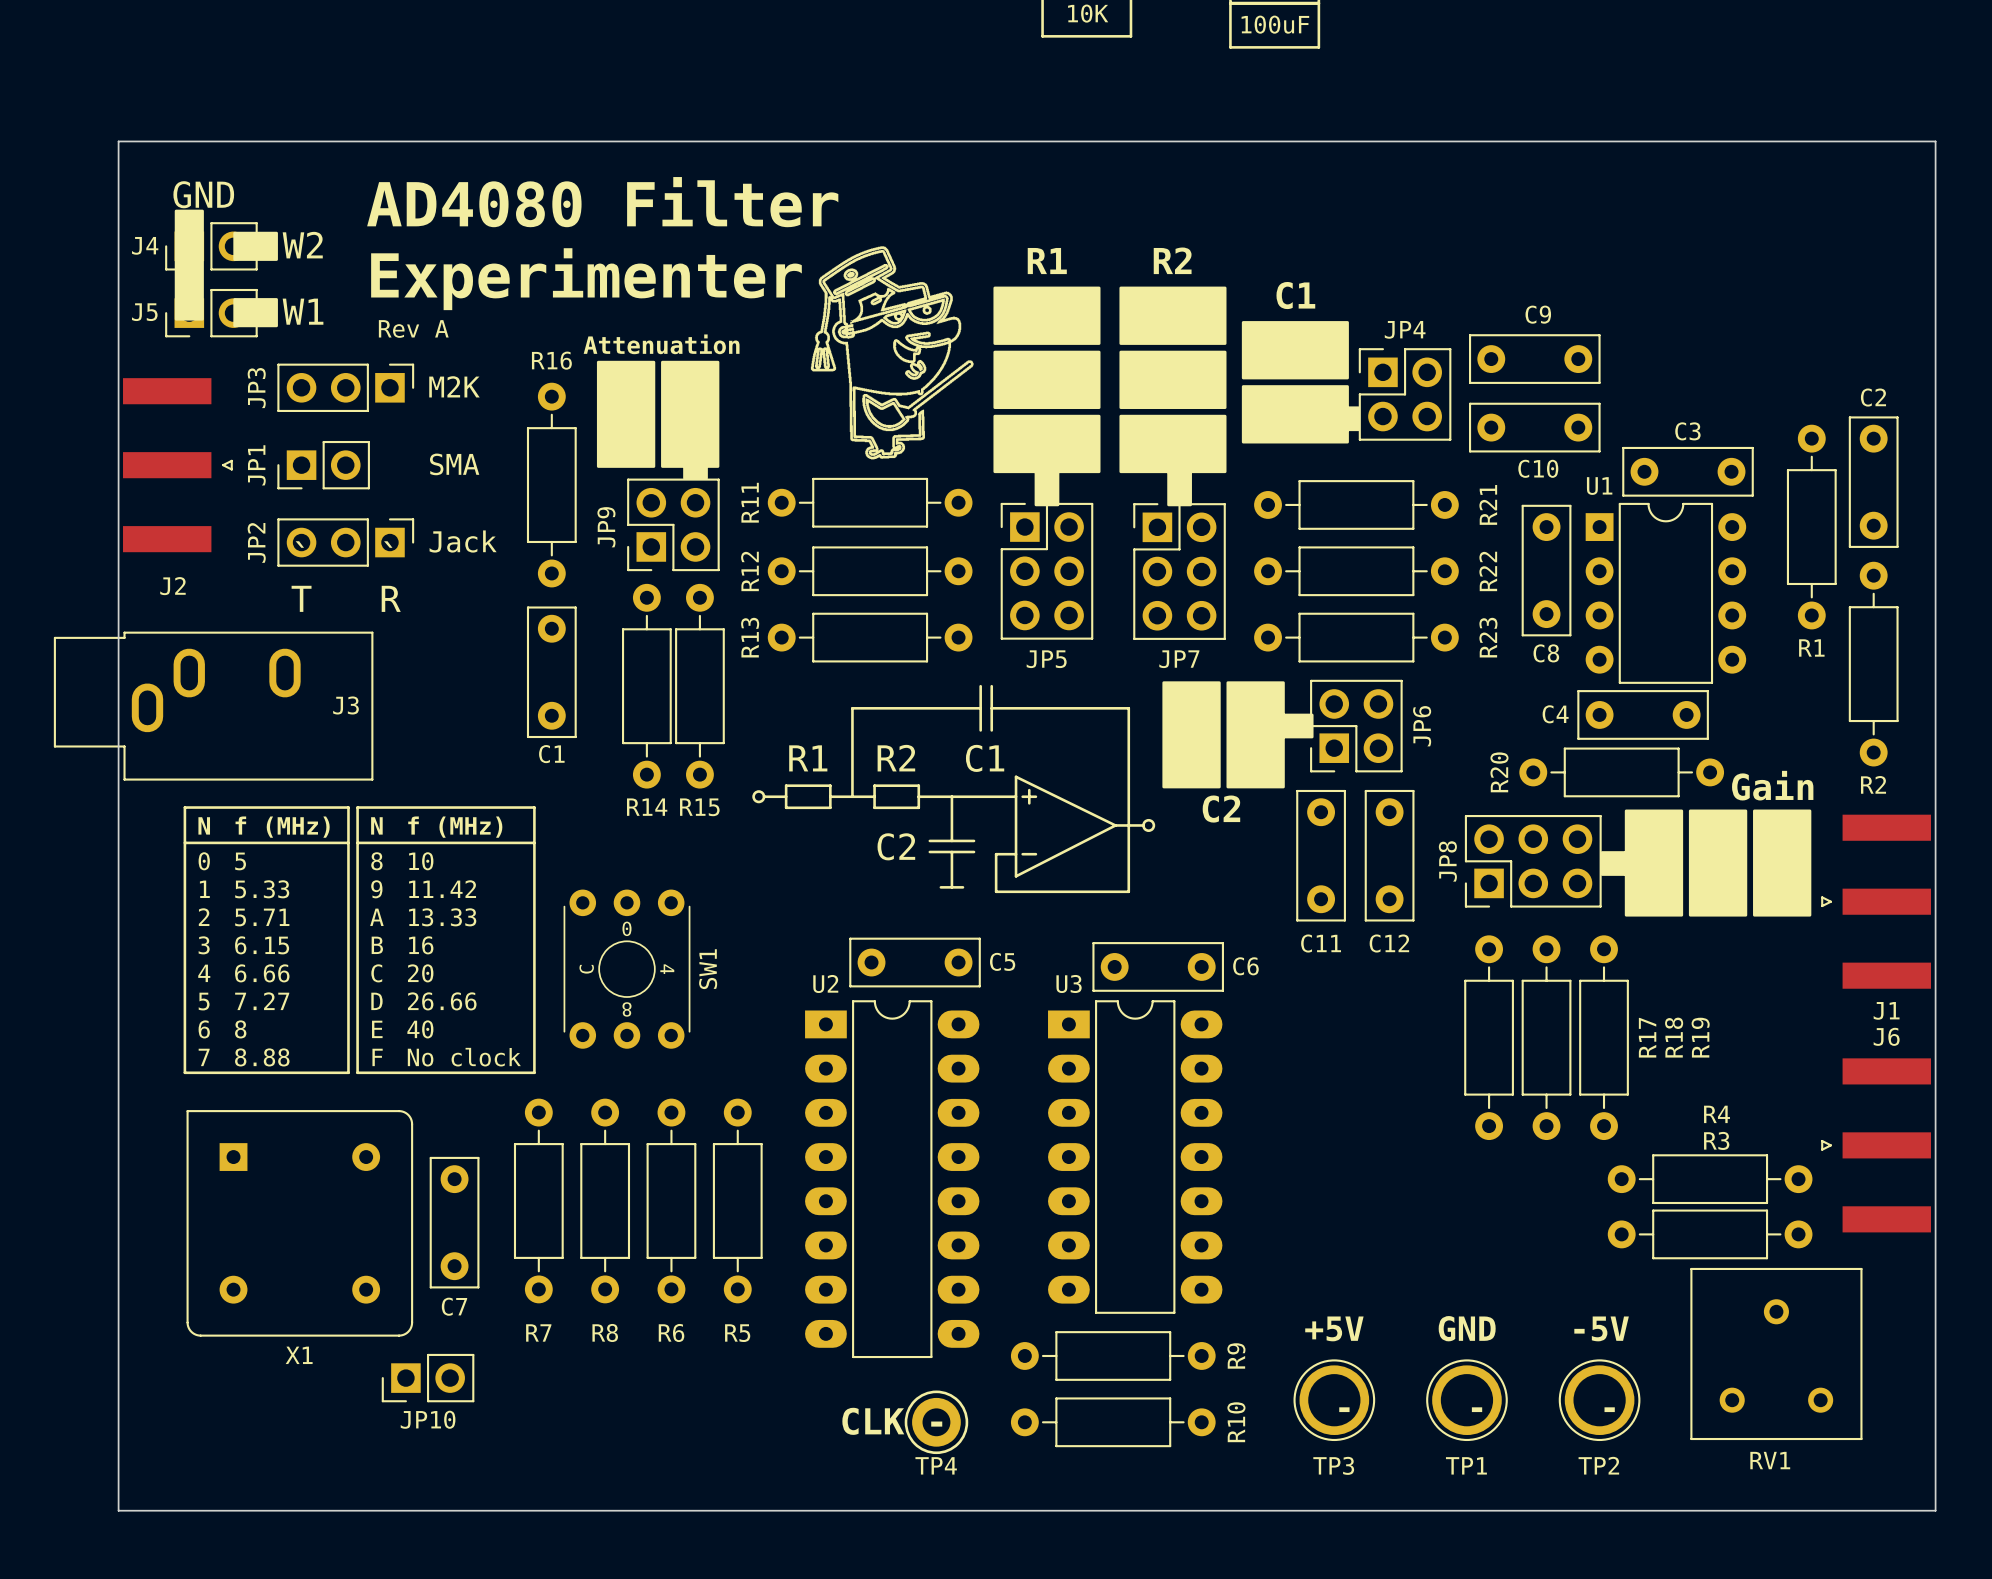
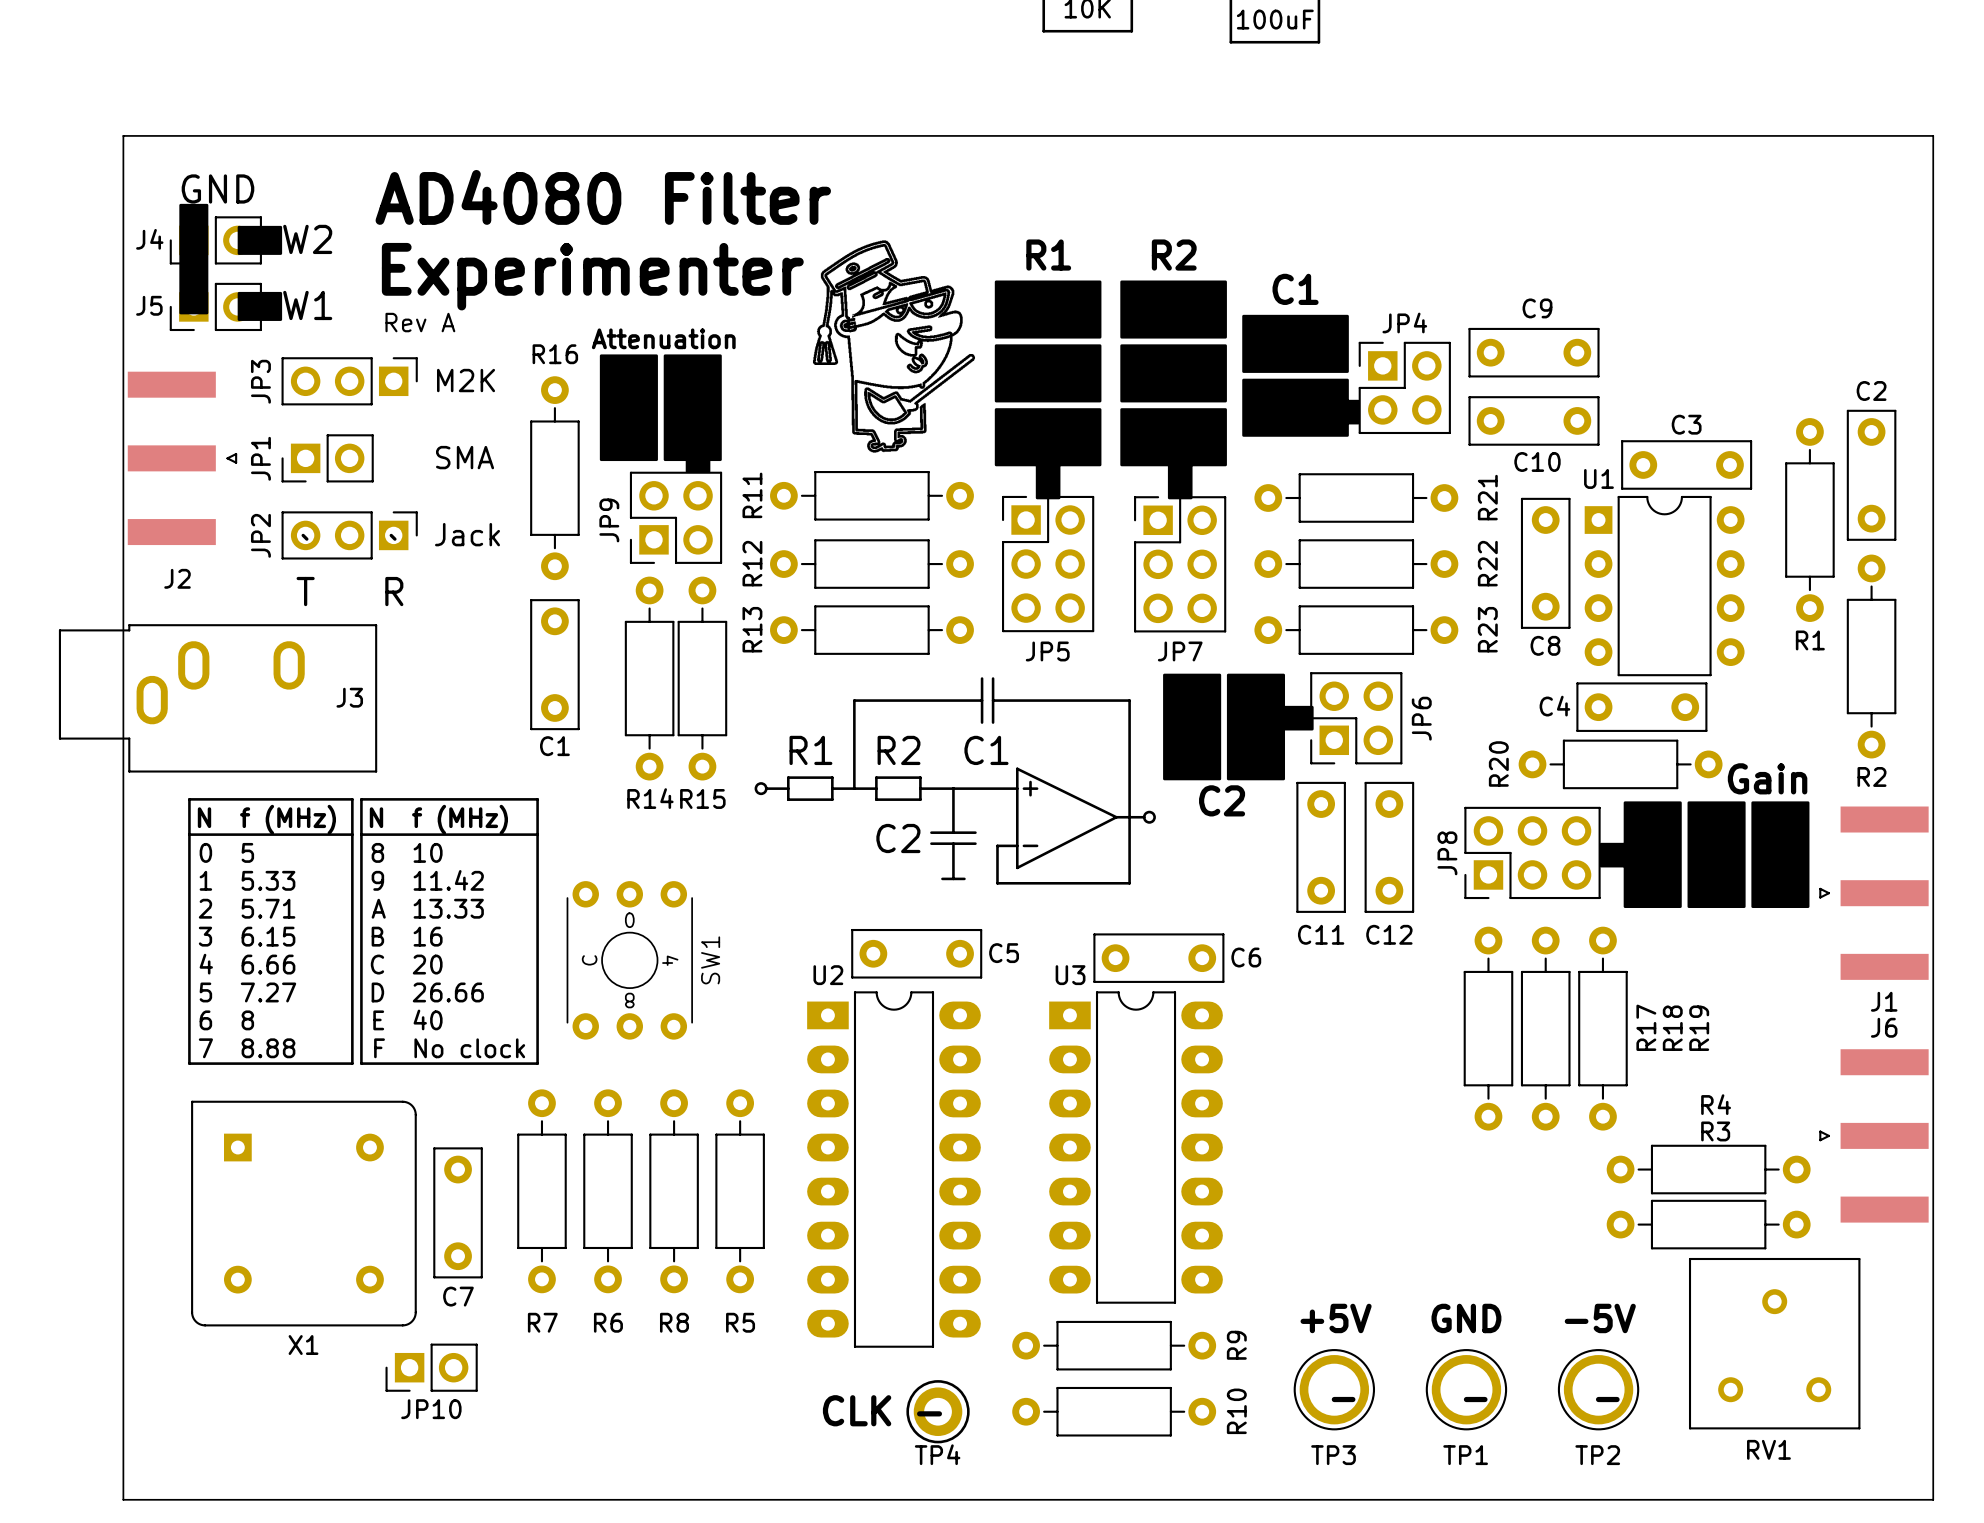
R8 name: R8 (605, 1332) -> R6 (608, 1322)
R6 name: R6 (671, 1332) -> R8 (674, 1322)

